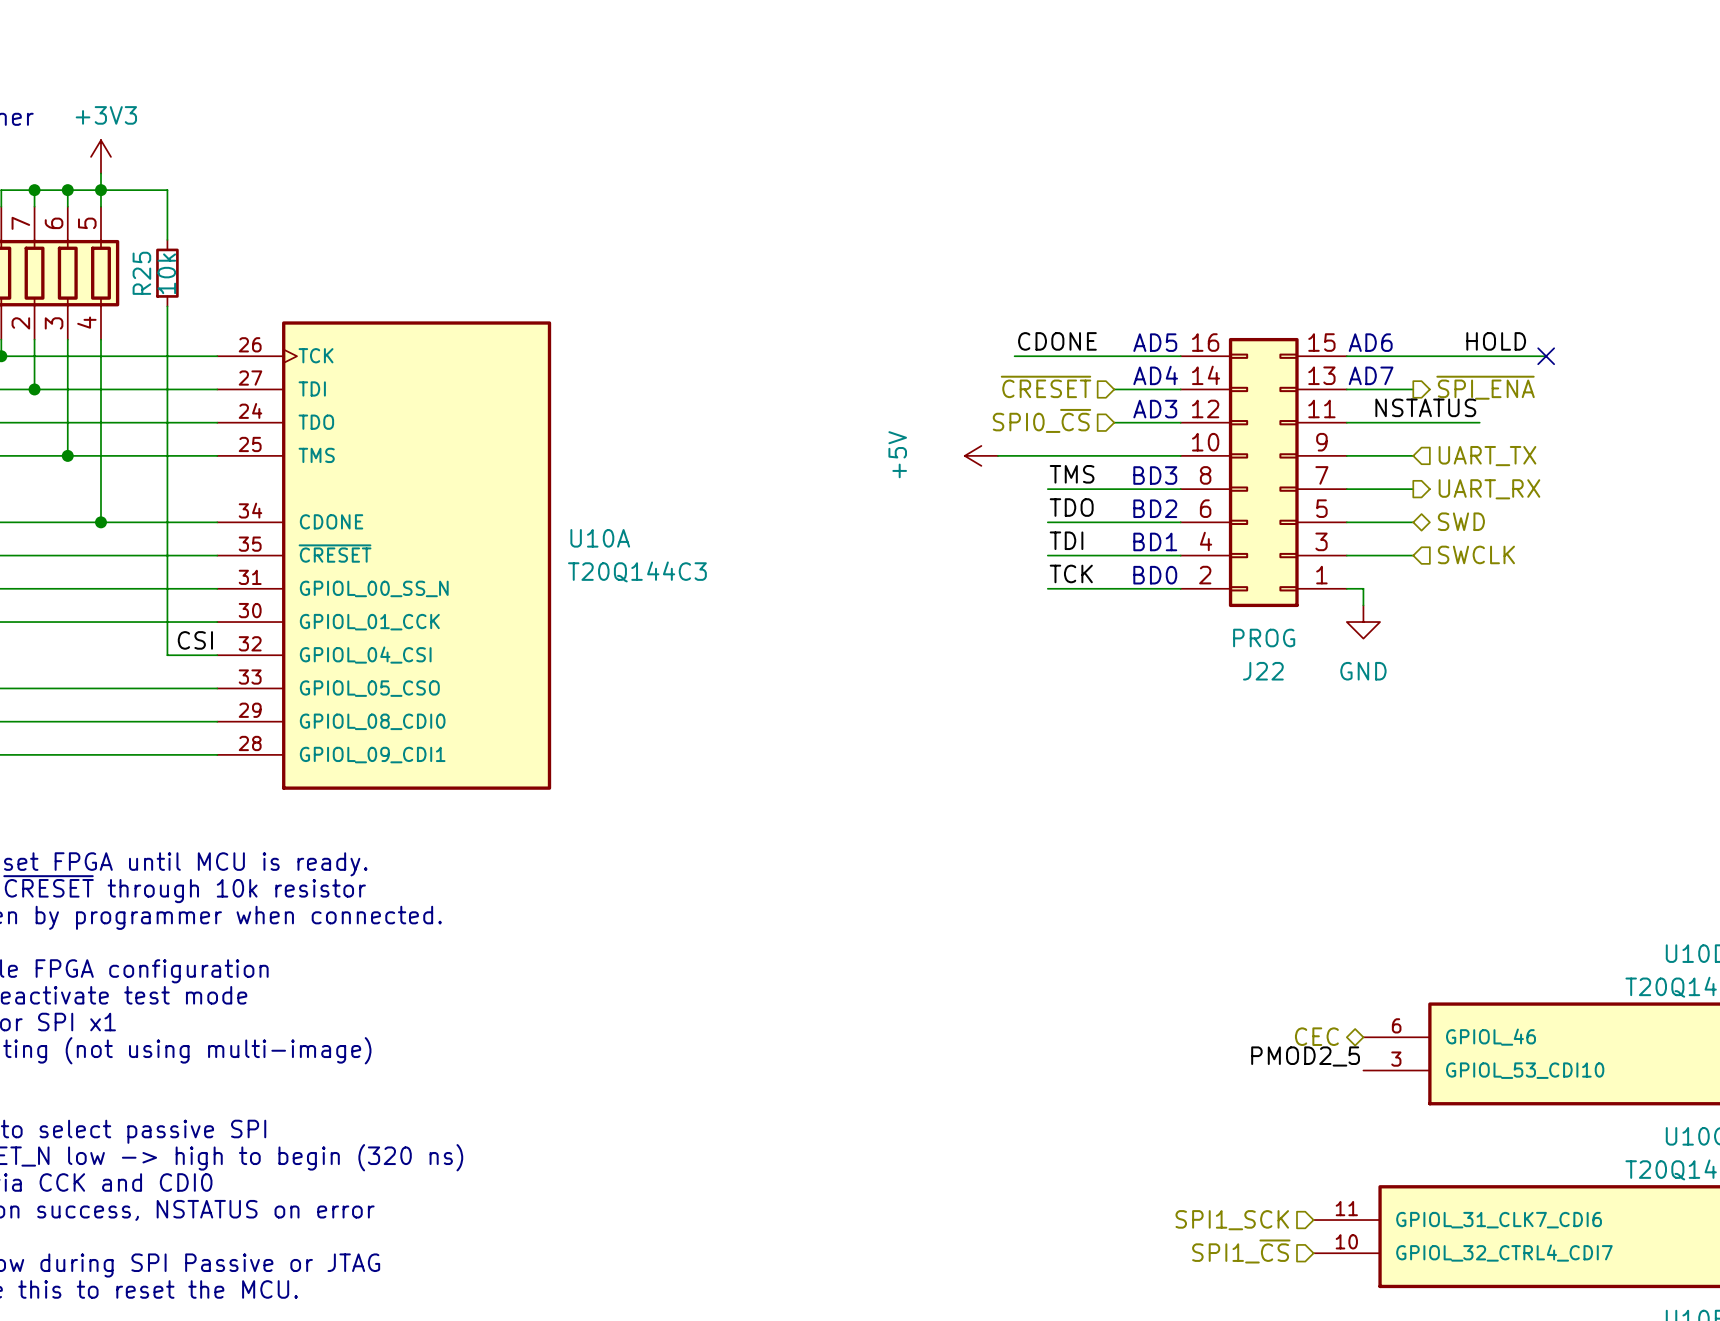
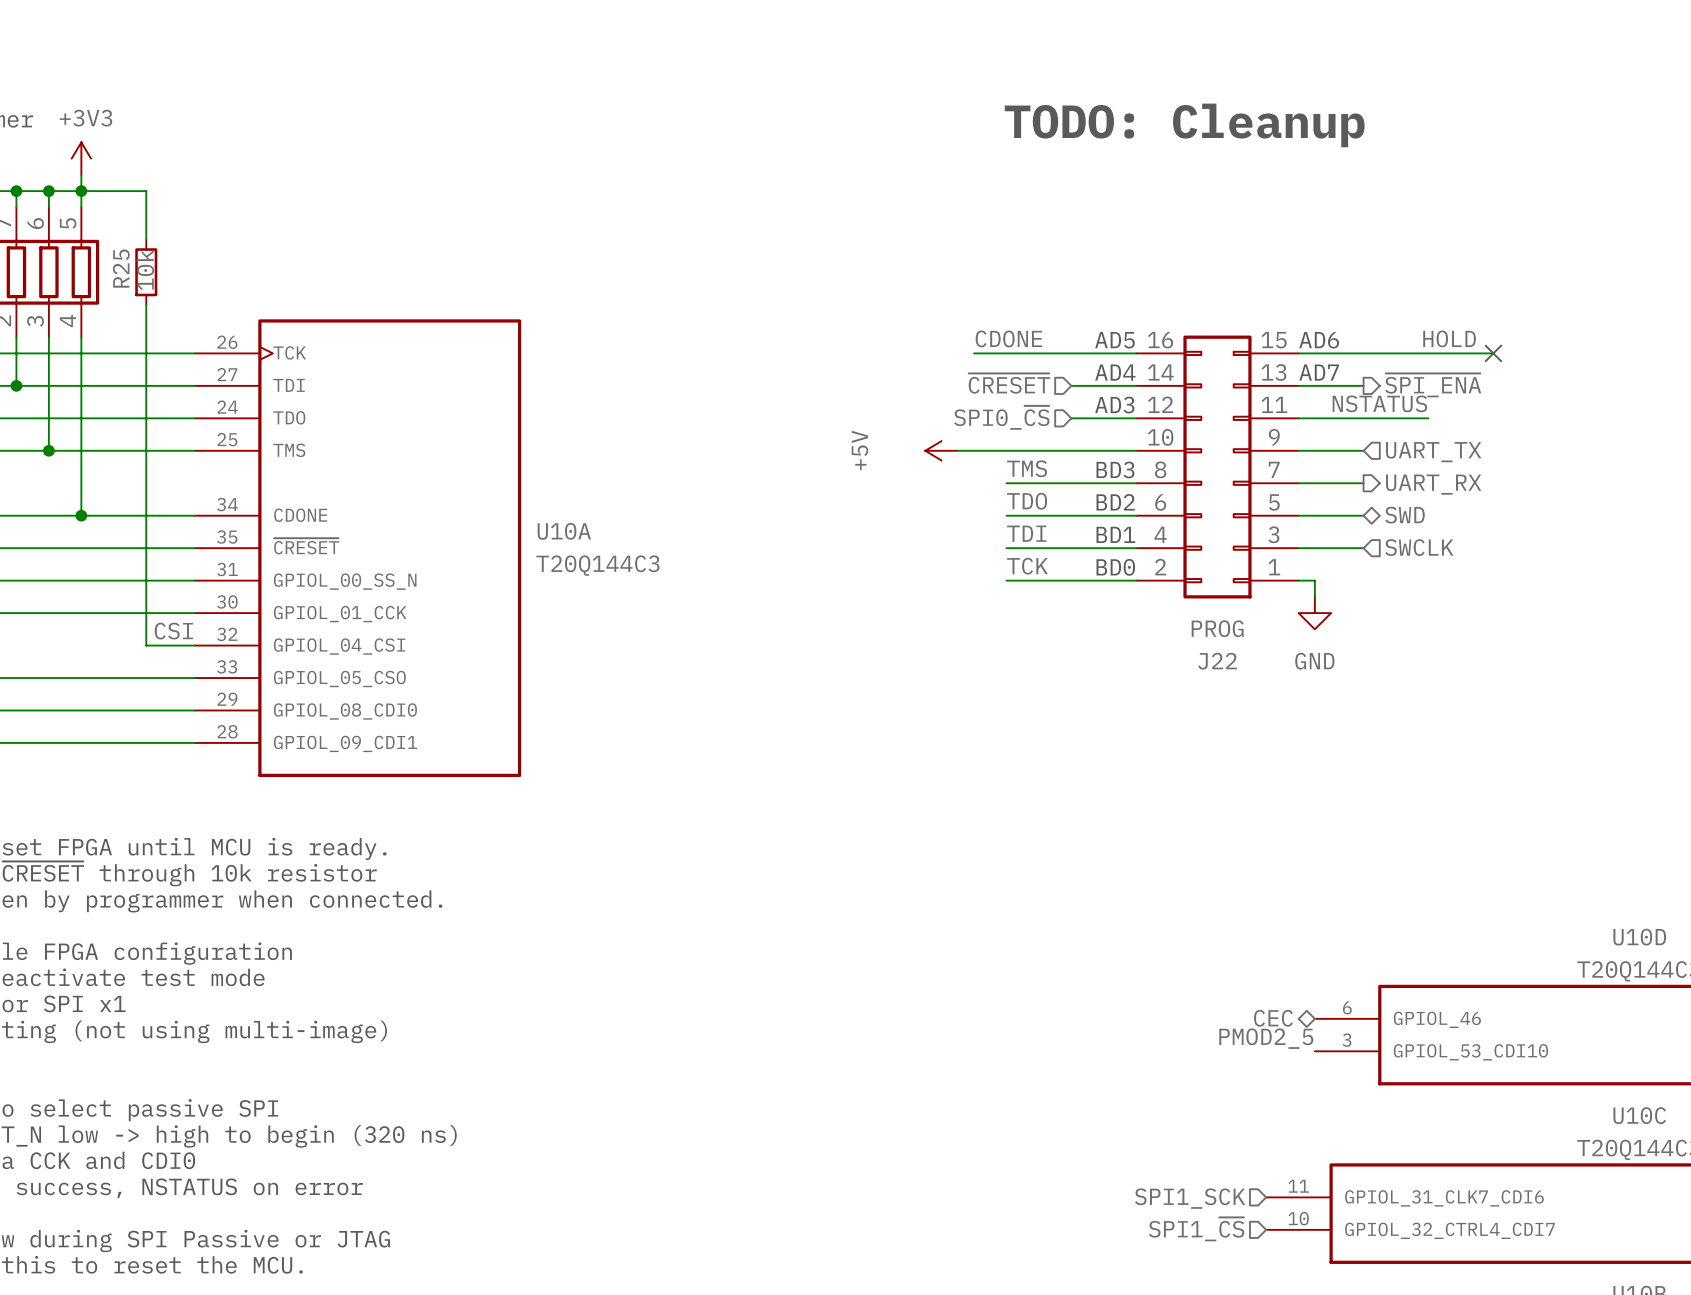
text: none -> TODO: Cleanup (1184, 125)

